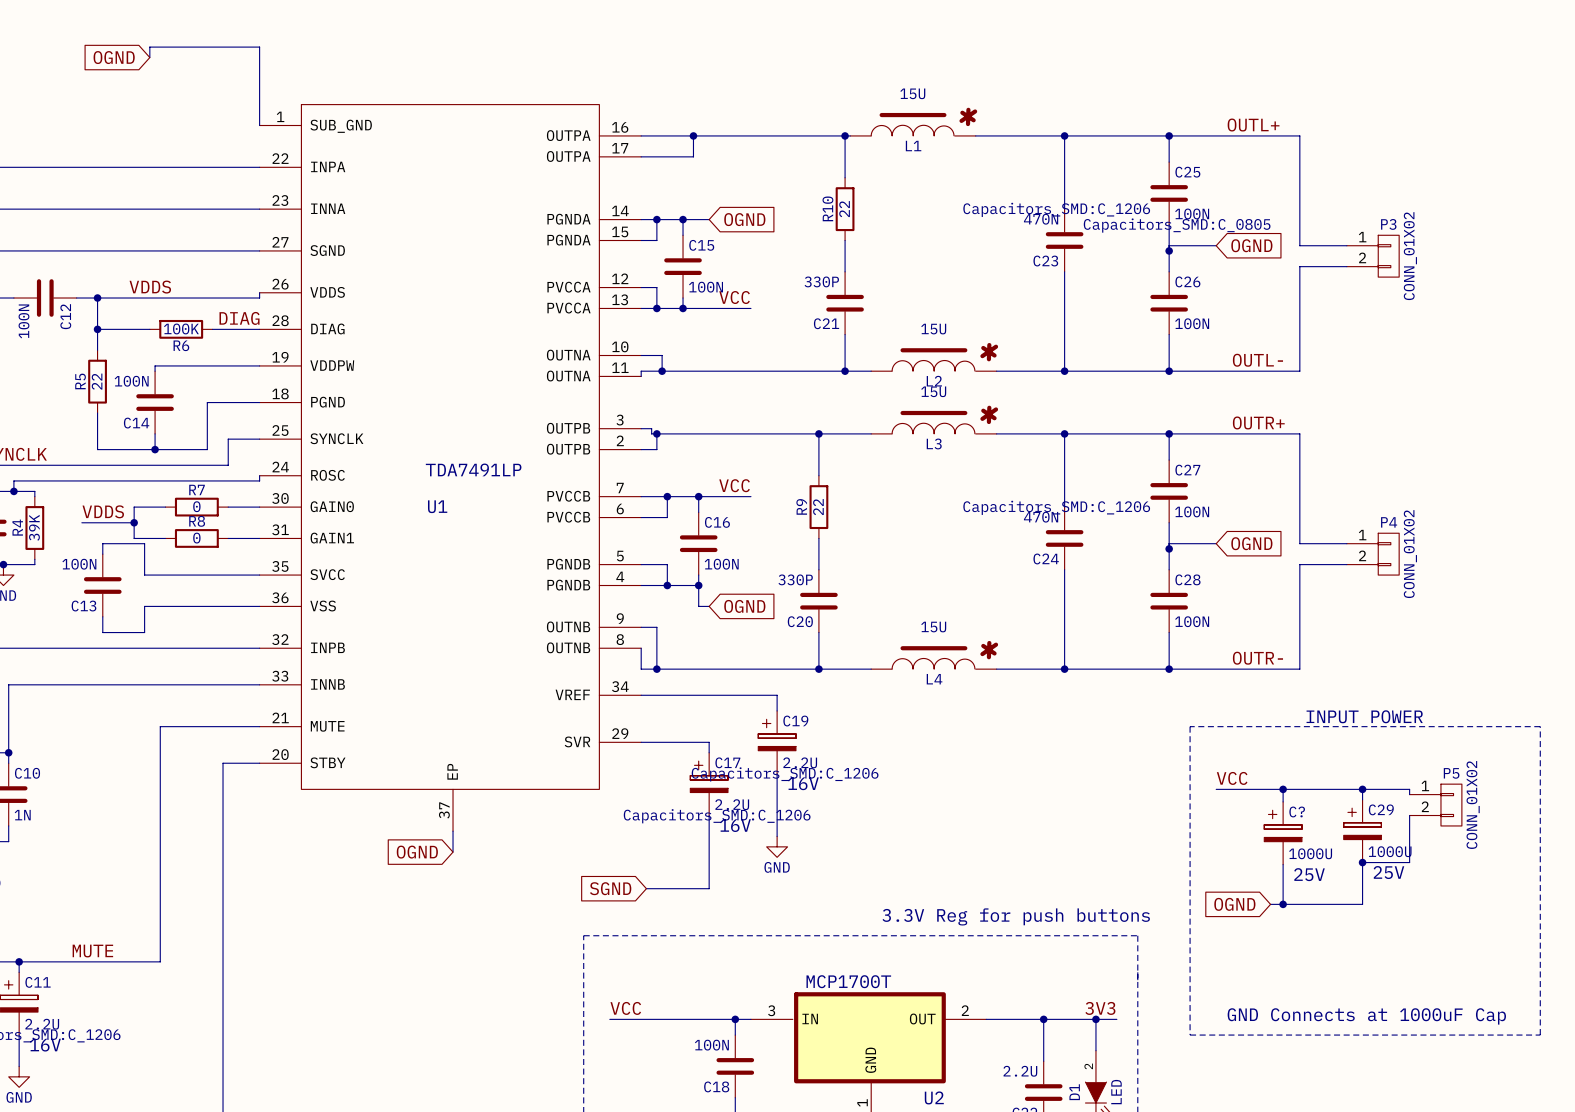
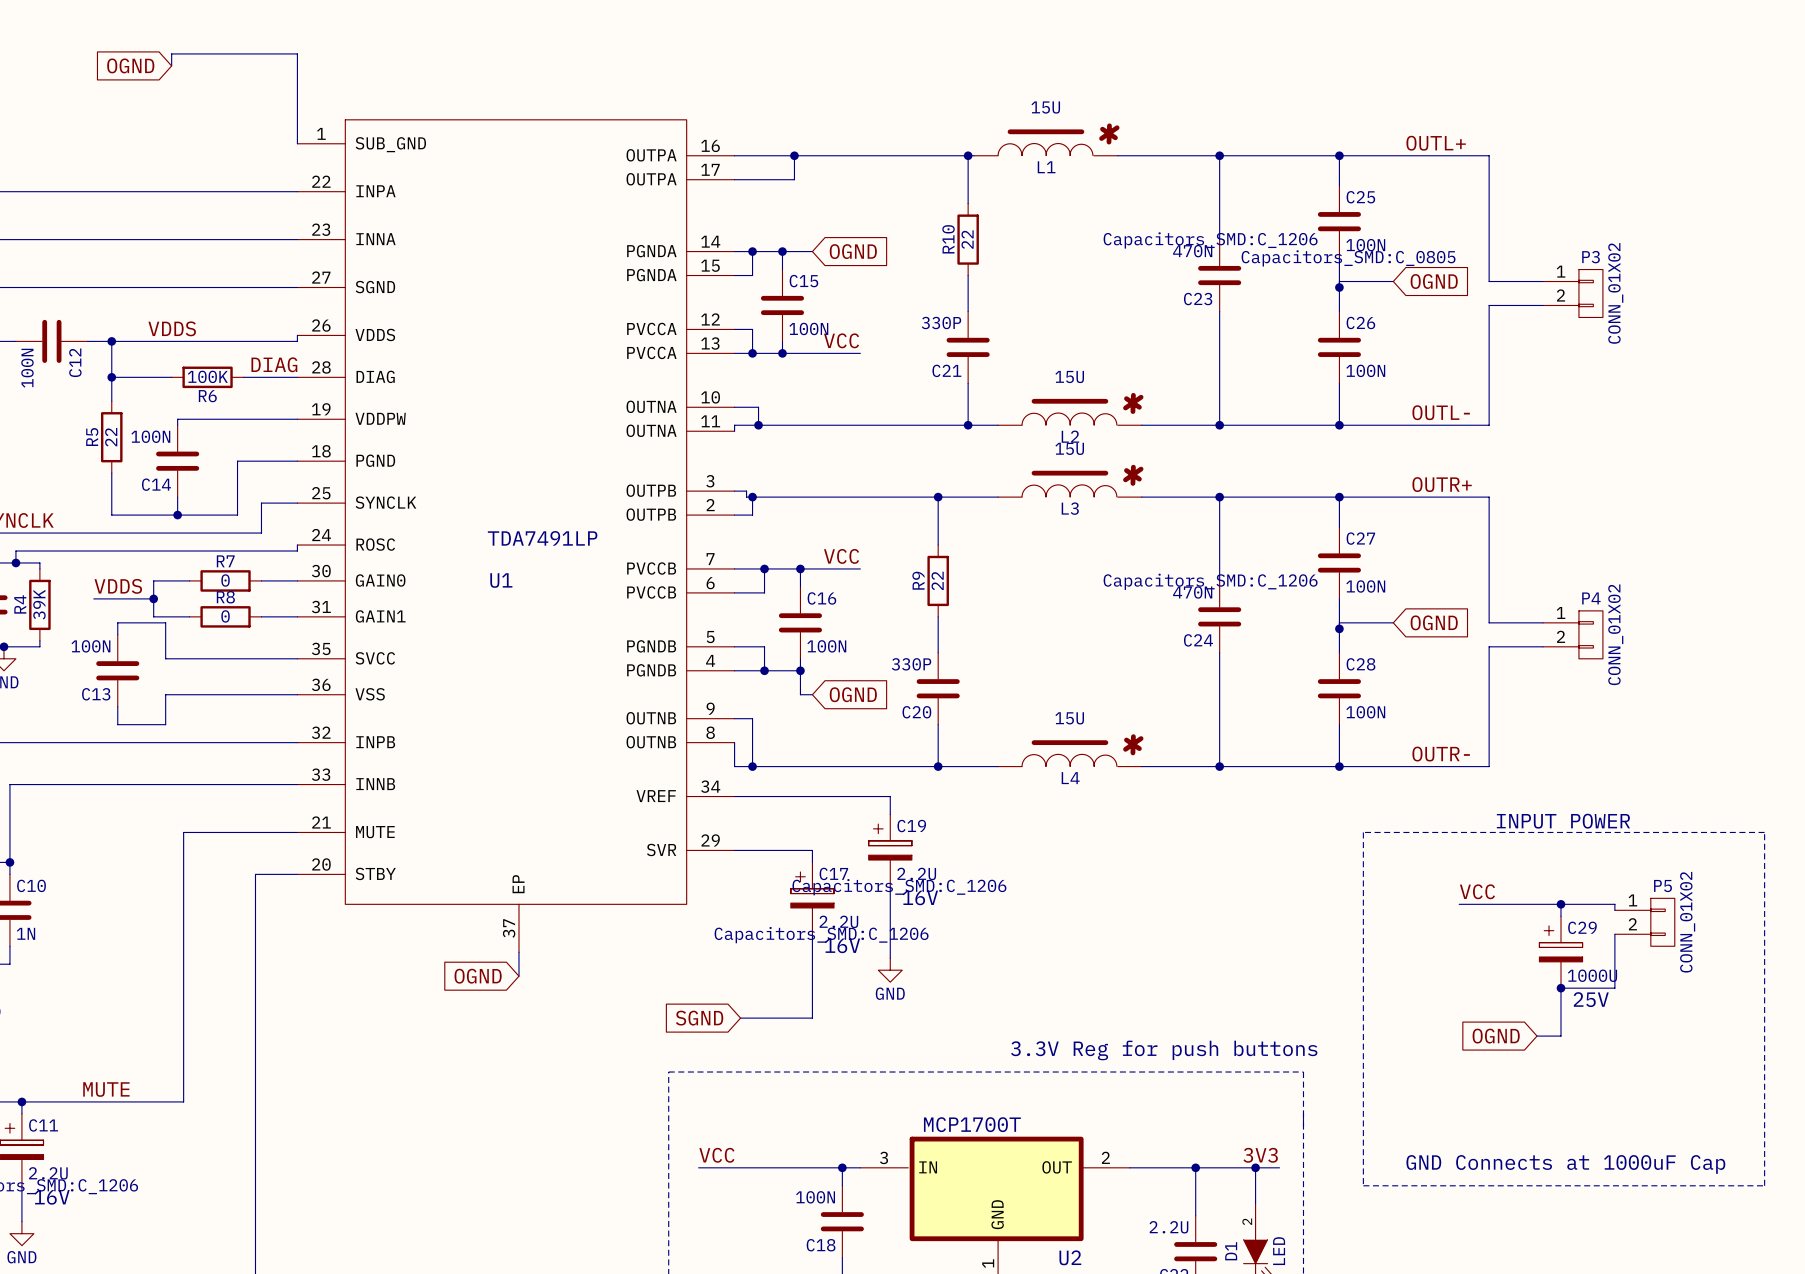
label position: VCC (1232, 778) -> VCC (1477, 891)
wire: (1216, 789) (1273, 789) -> none
wire: (1283, 789) (1283, 801) -> none
junction: (1283, 789) -> none
C?: 1000U (1283, 833) -> none
wire: (1283, 864) (1283, 904) -> none
global label position: OGND (1234, 904) -> OGND (1496, 1036)
wire: (1270, 904) (1341, 904) -> none
junction: (1283, 904) -> none

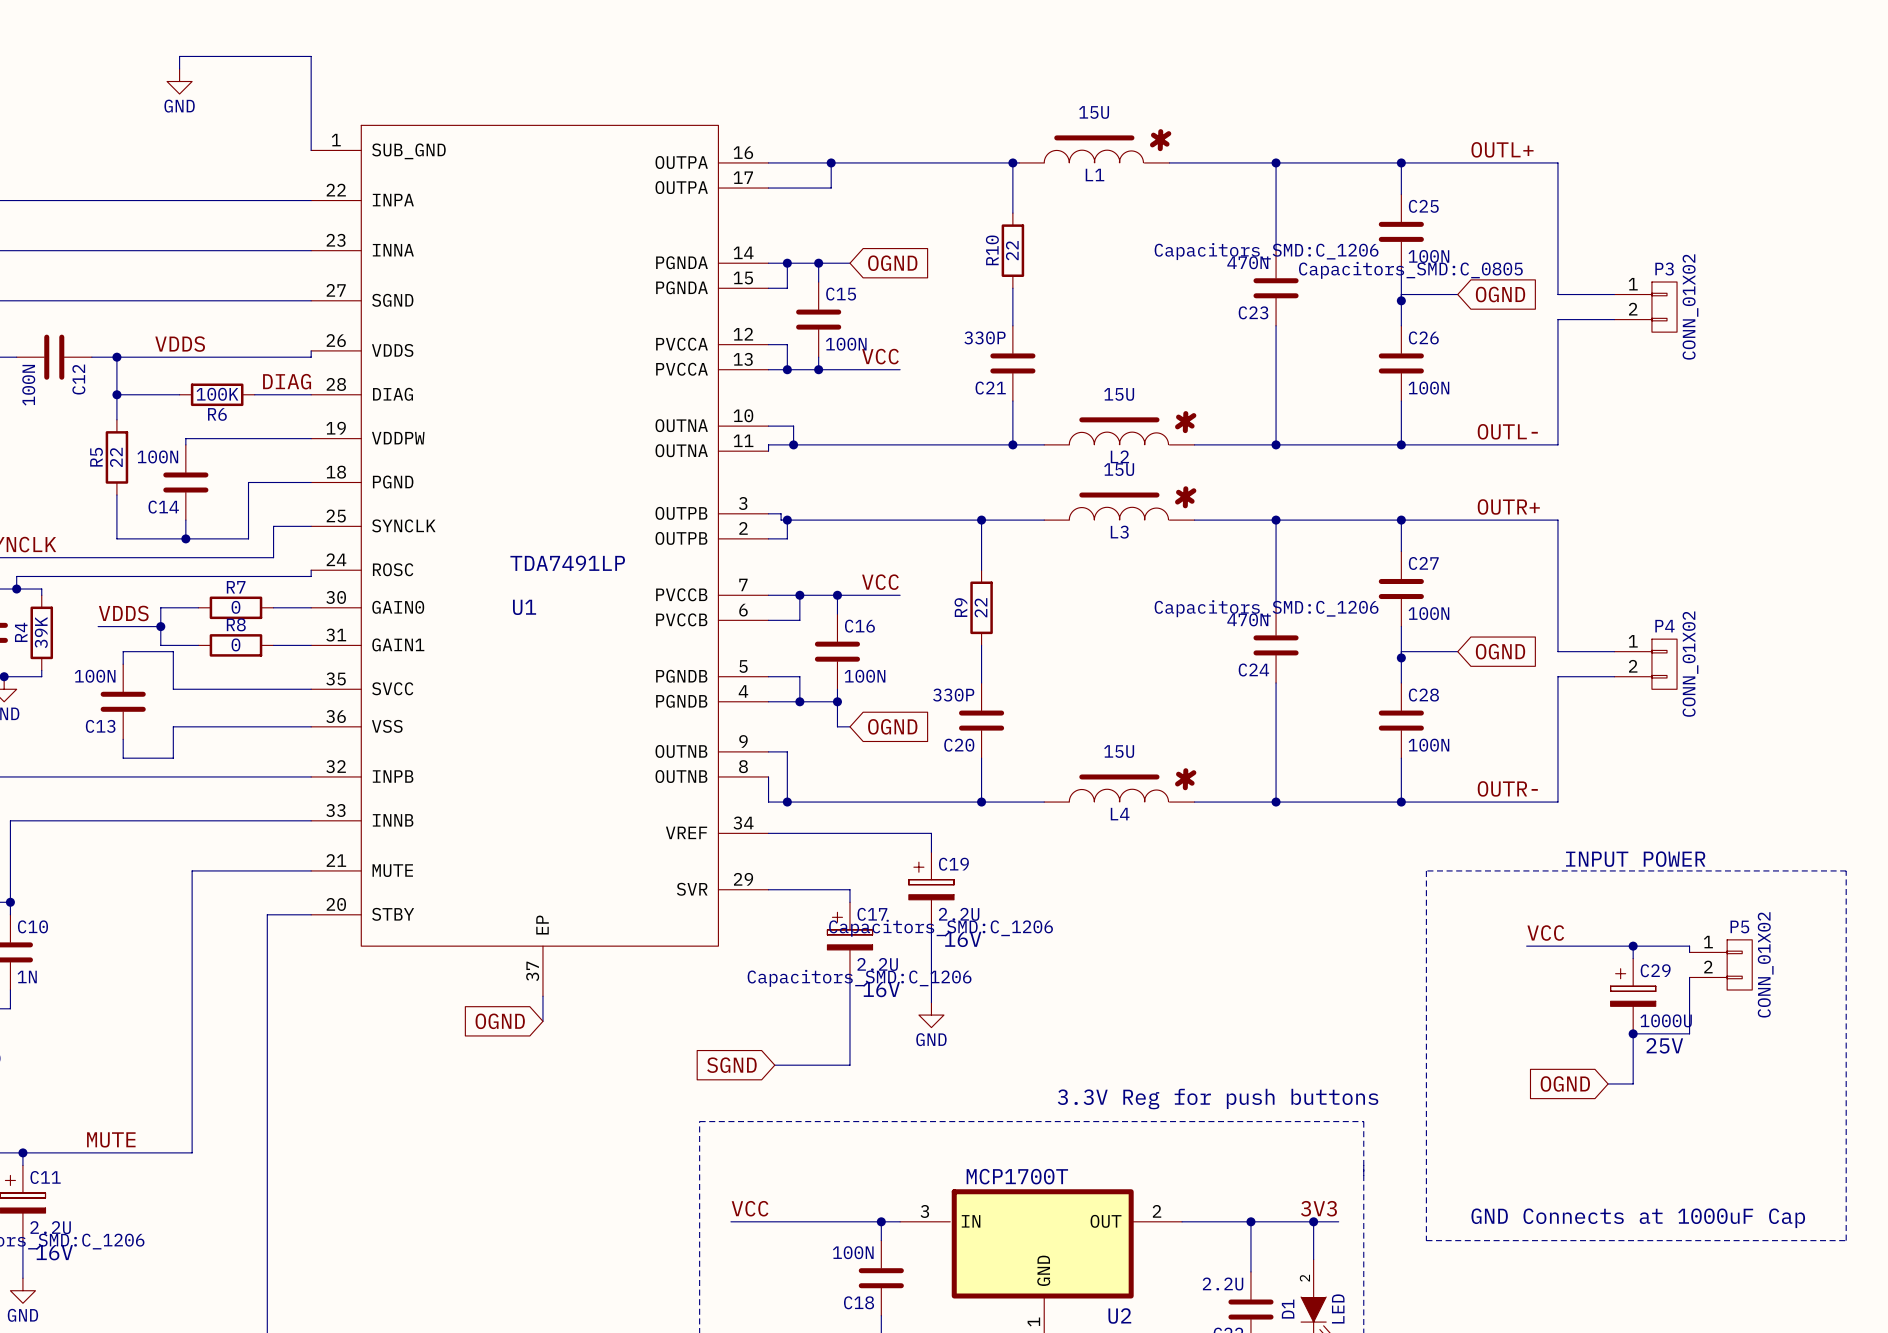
global label: OGND (130, 65) -> none
power symbol: none -> GND (179, 81)

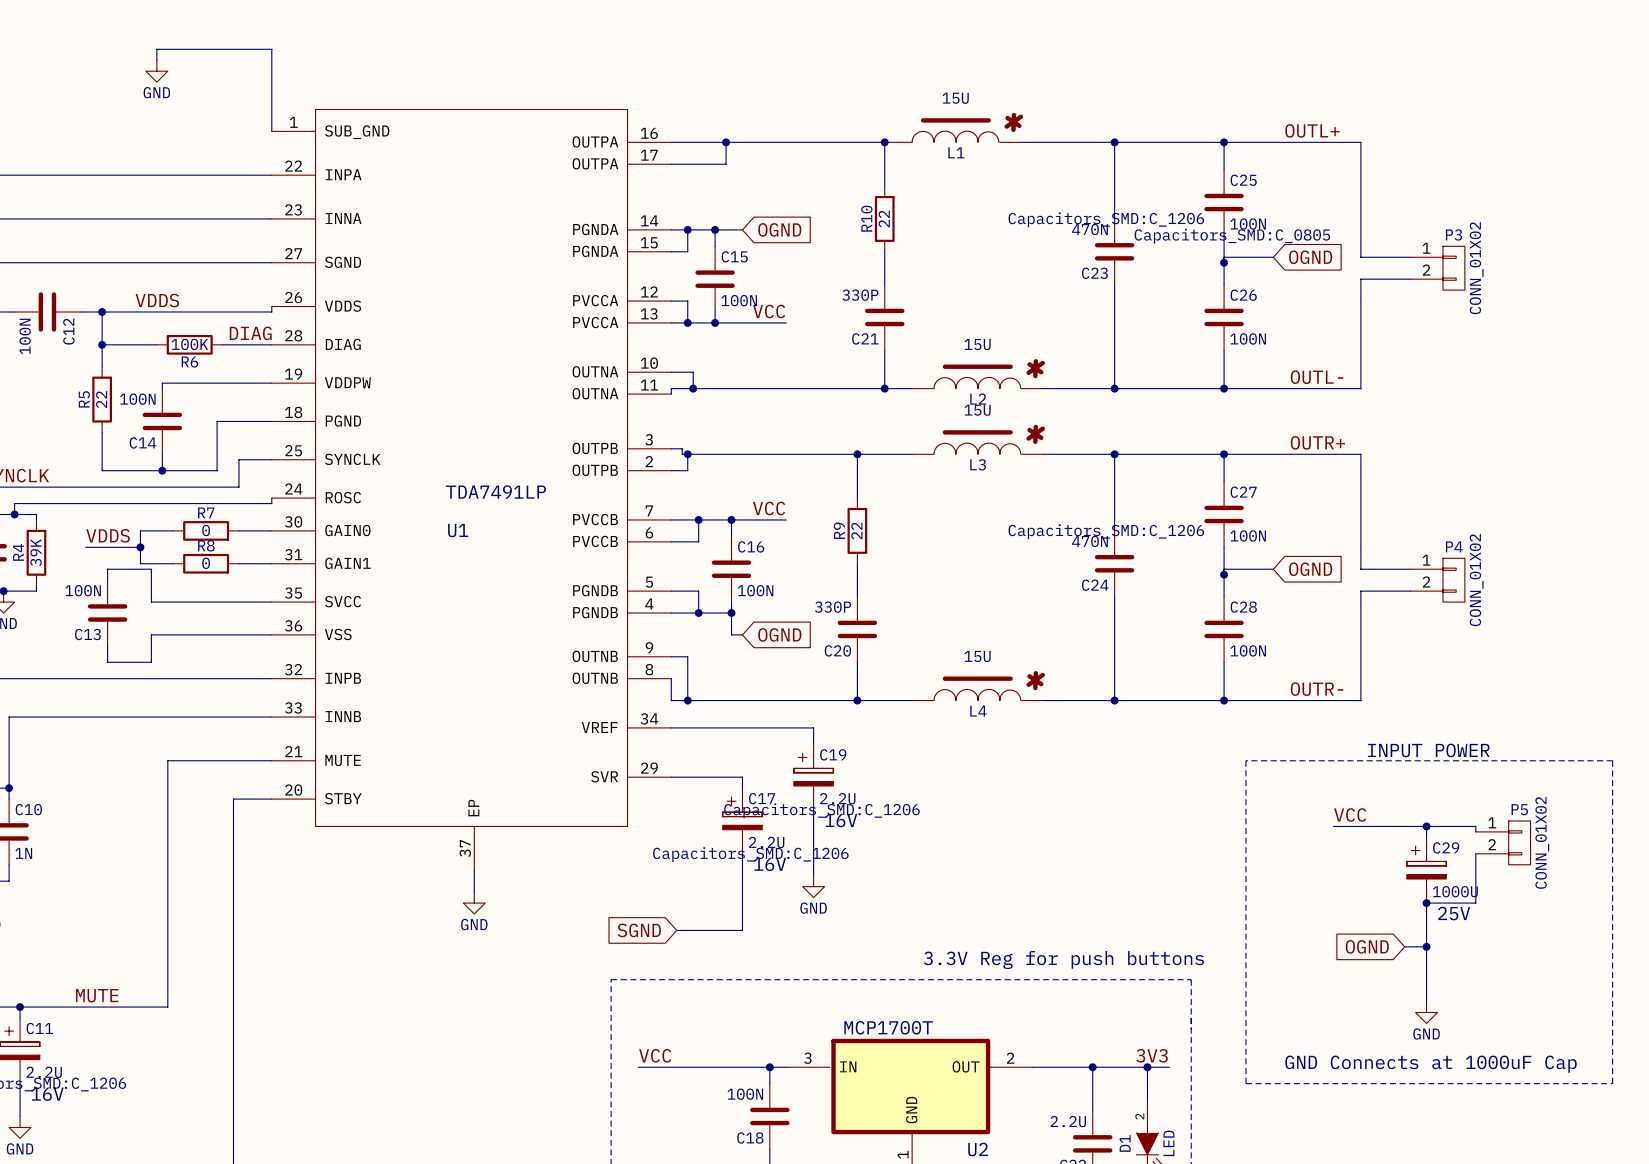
global label: OGND (500, 1021) -> none
power symbol: none -> GND (474, 903)
wire: none -> (1426, 946) (1426, 1001)
junction: none -> (1426, 946)
power symbol: none -> GND (1426, 1012)

